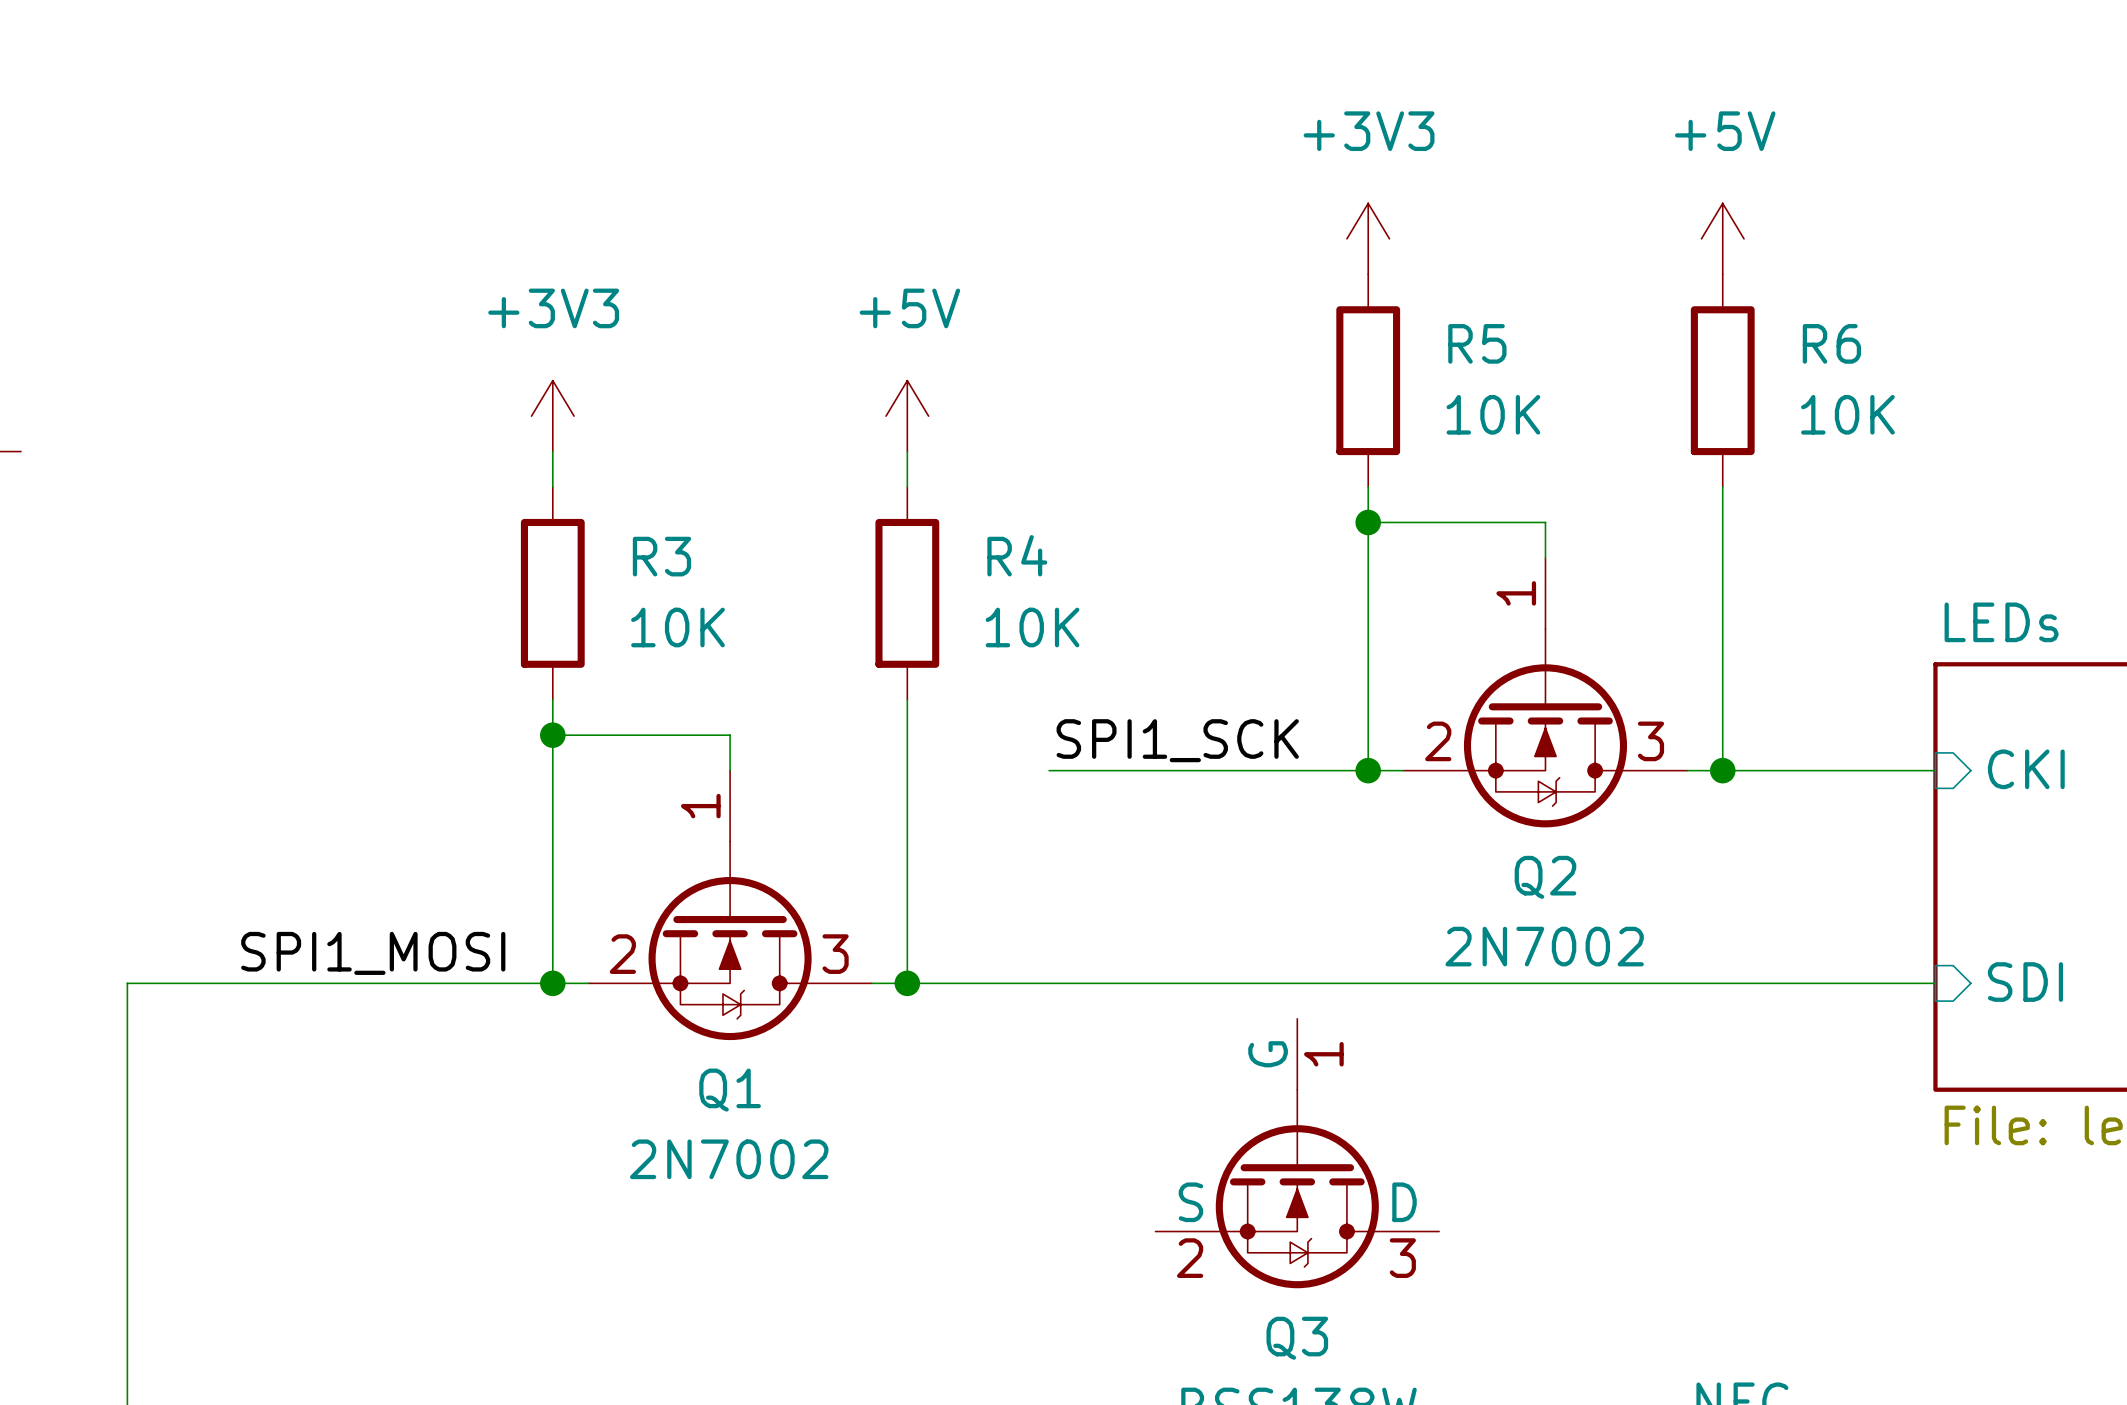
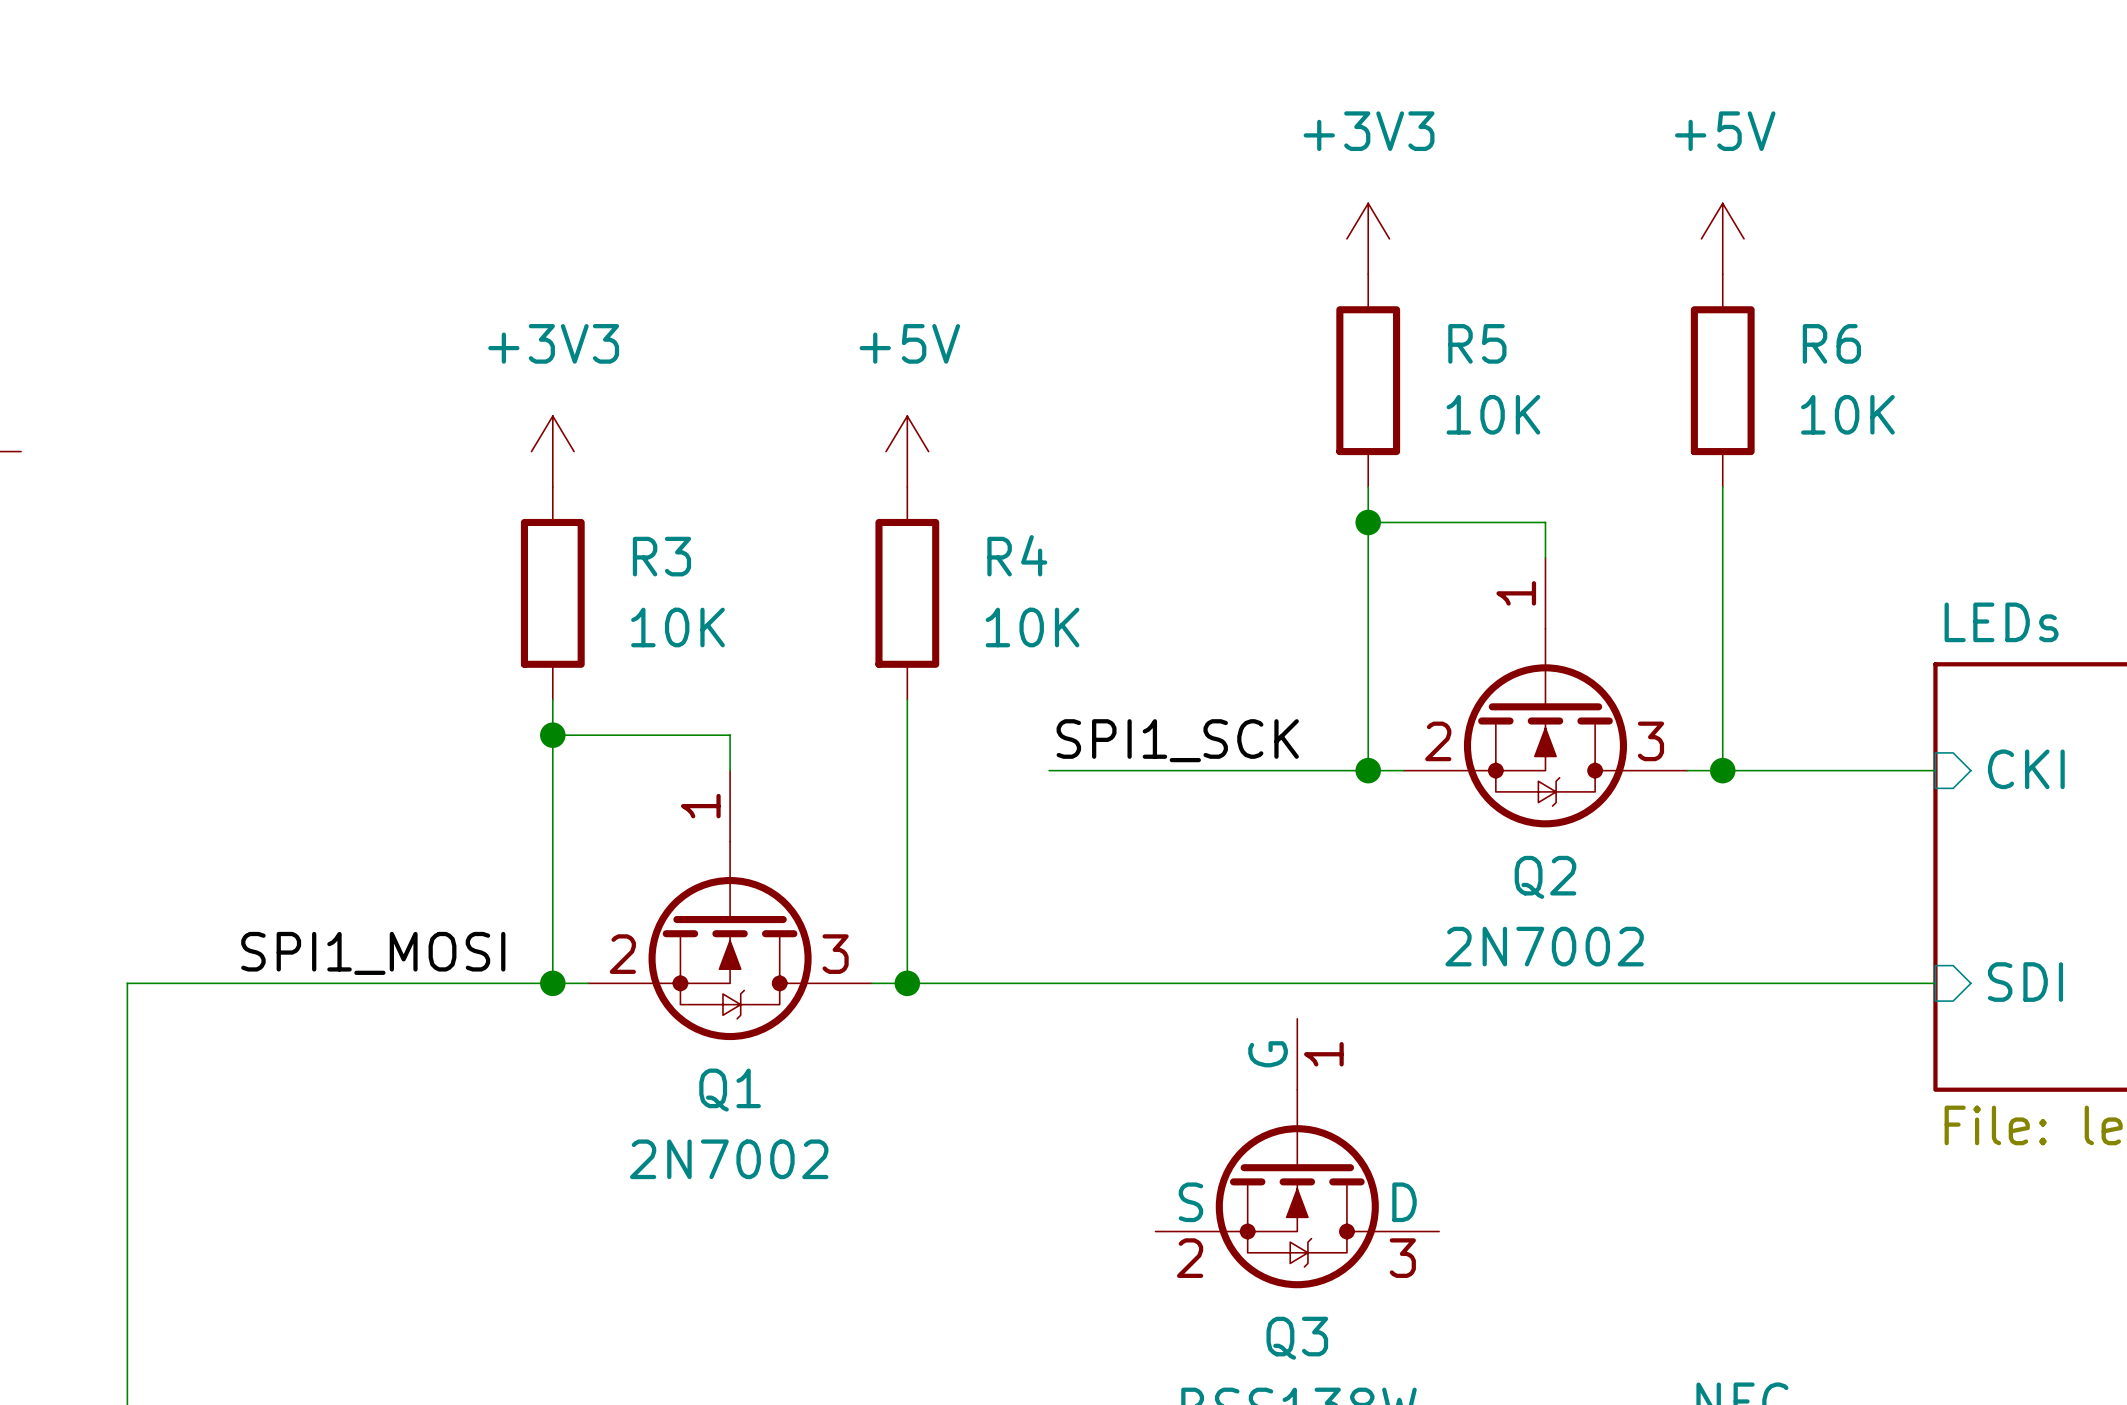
power symbol position: +3V3 (552, 416) -> +3V3 (552, 451)
power symbol position: +5V (907, 416) -> +5V (907, 451)

